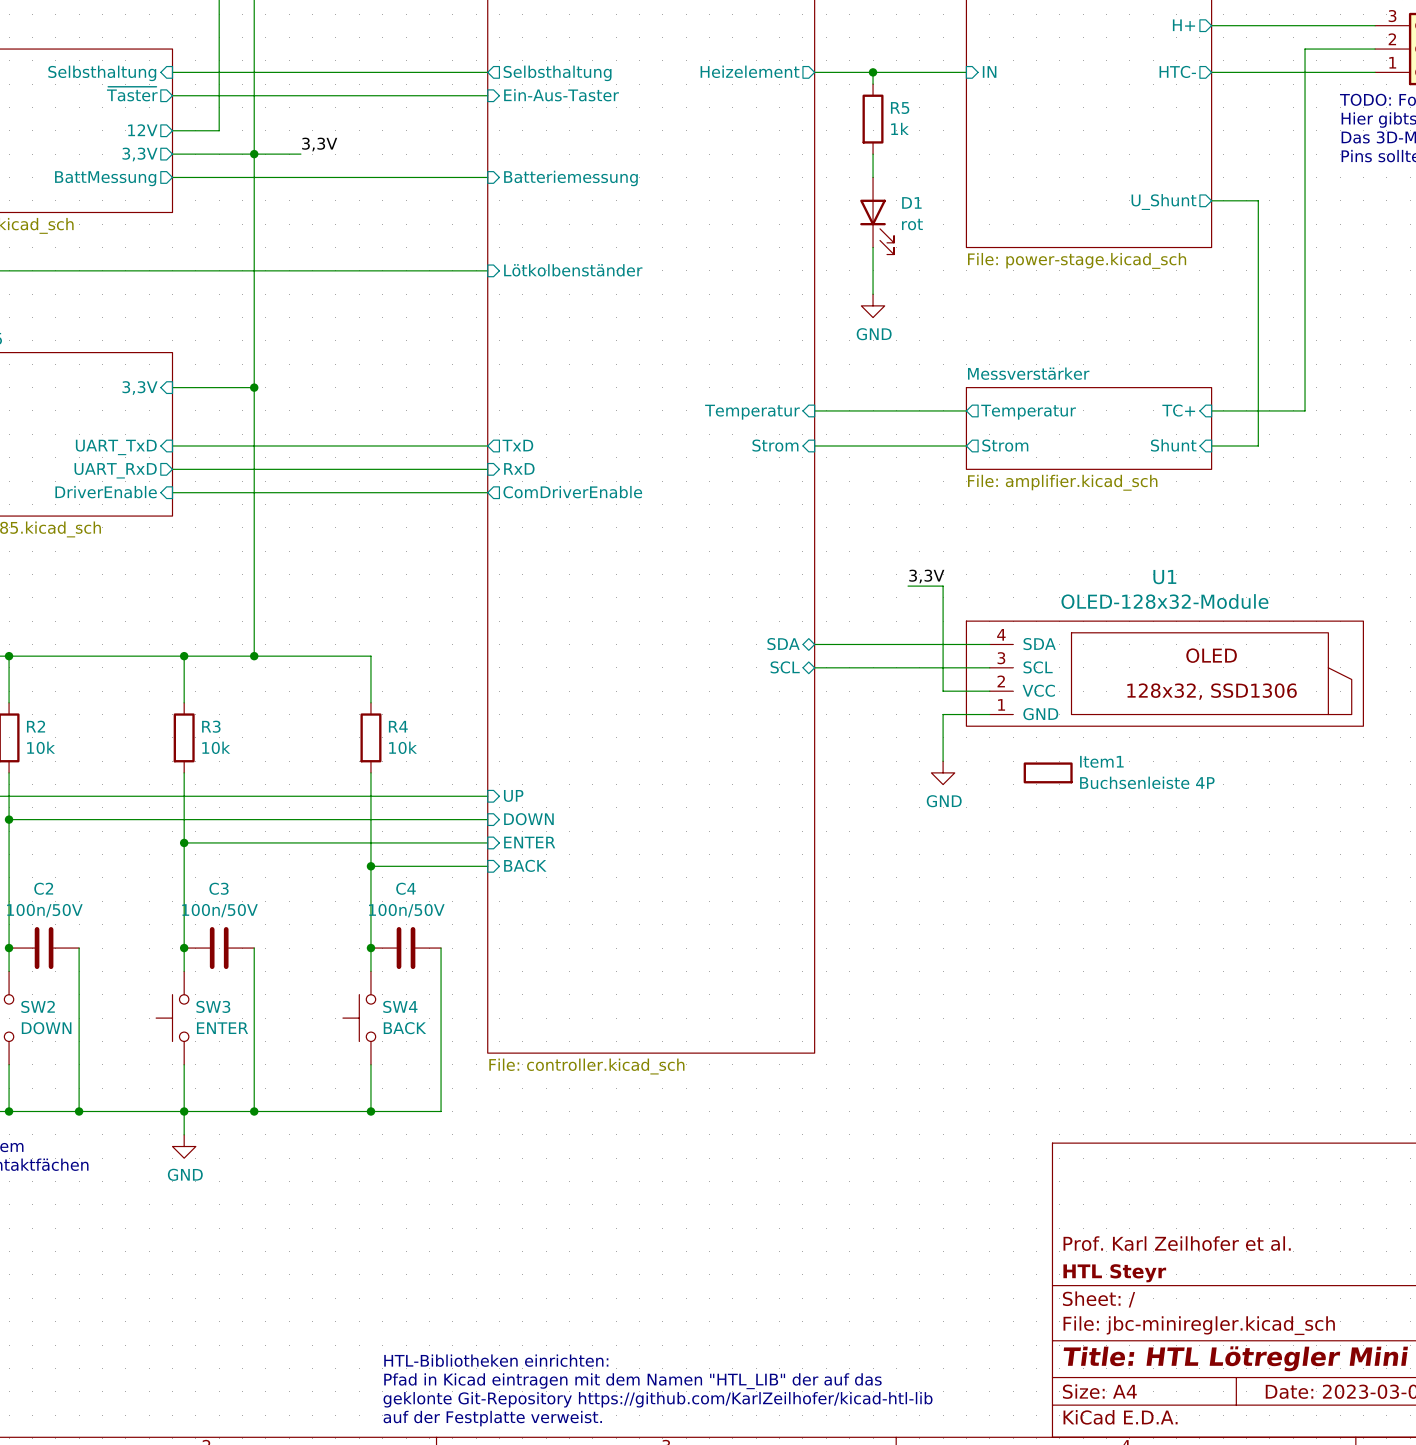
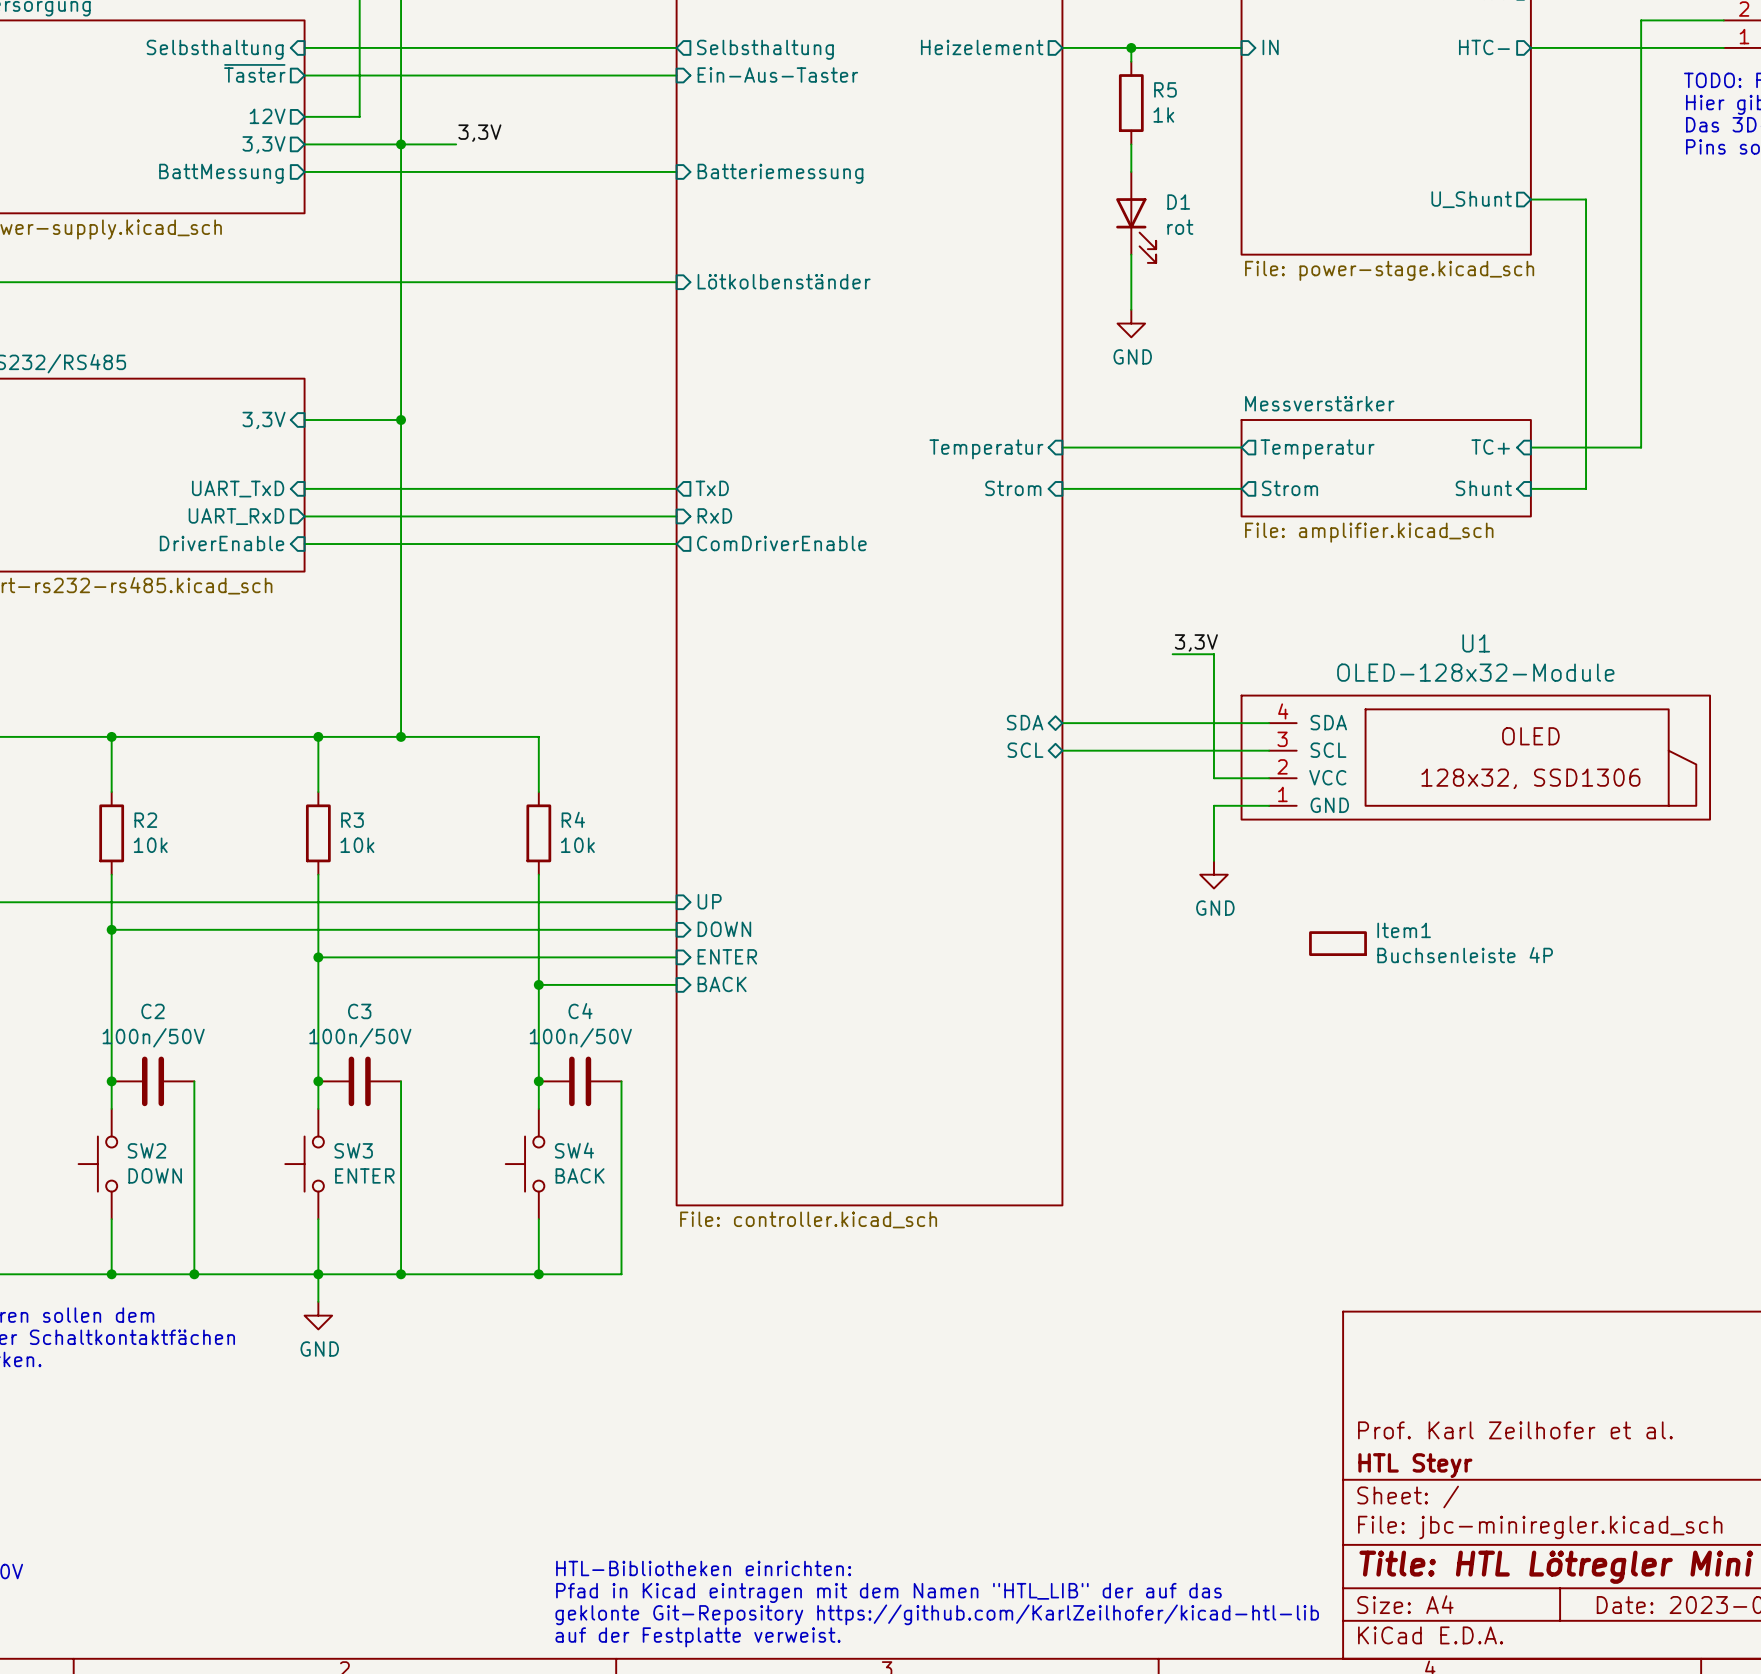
Item1 position: (1048, 772) -> (1338, 943)

